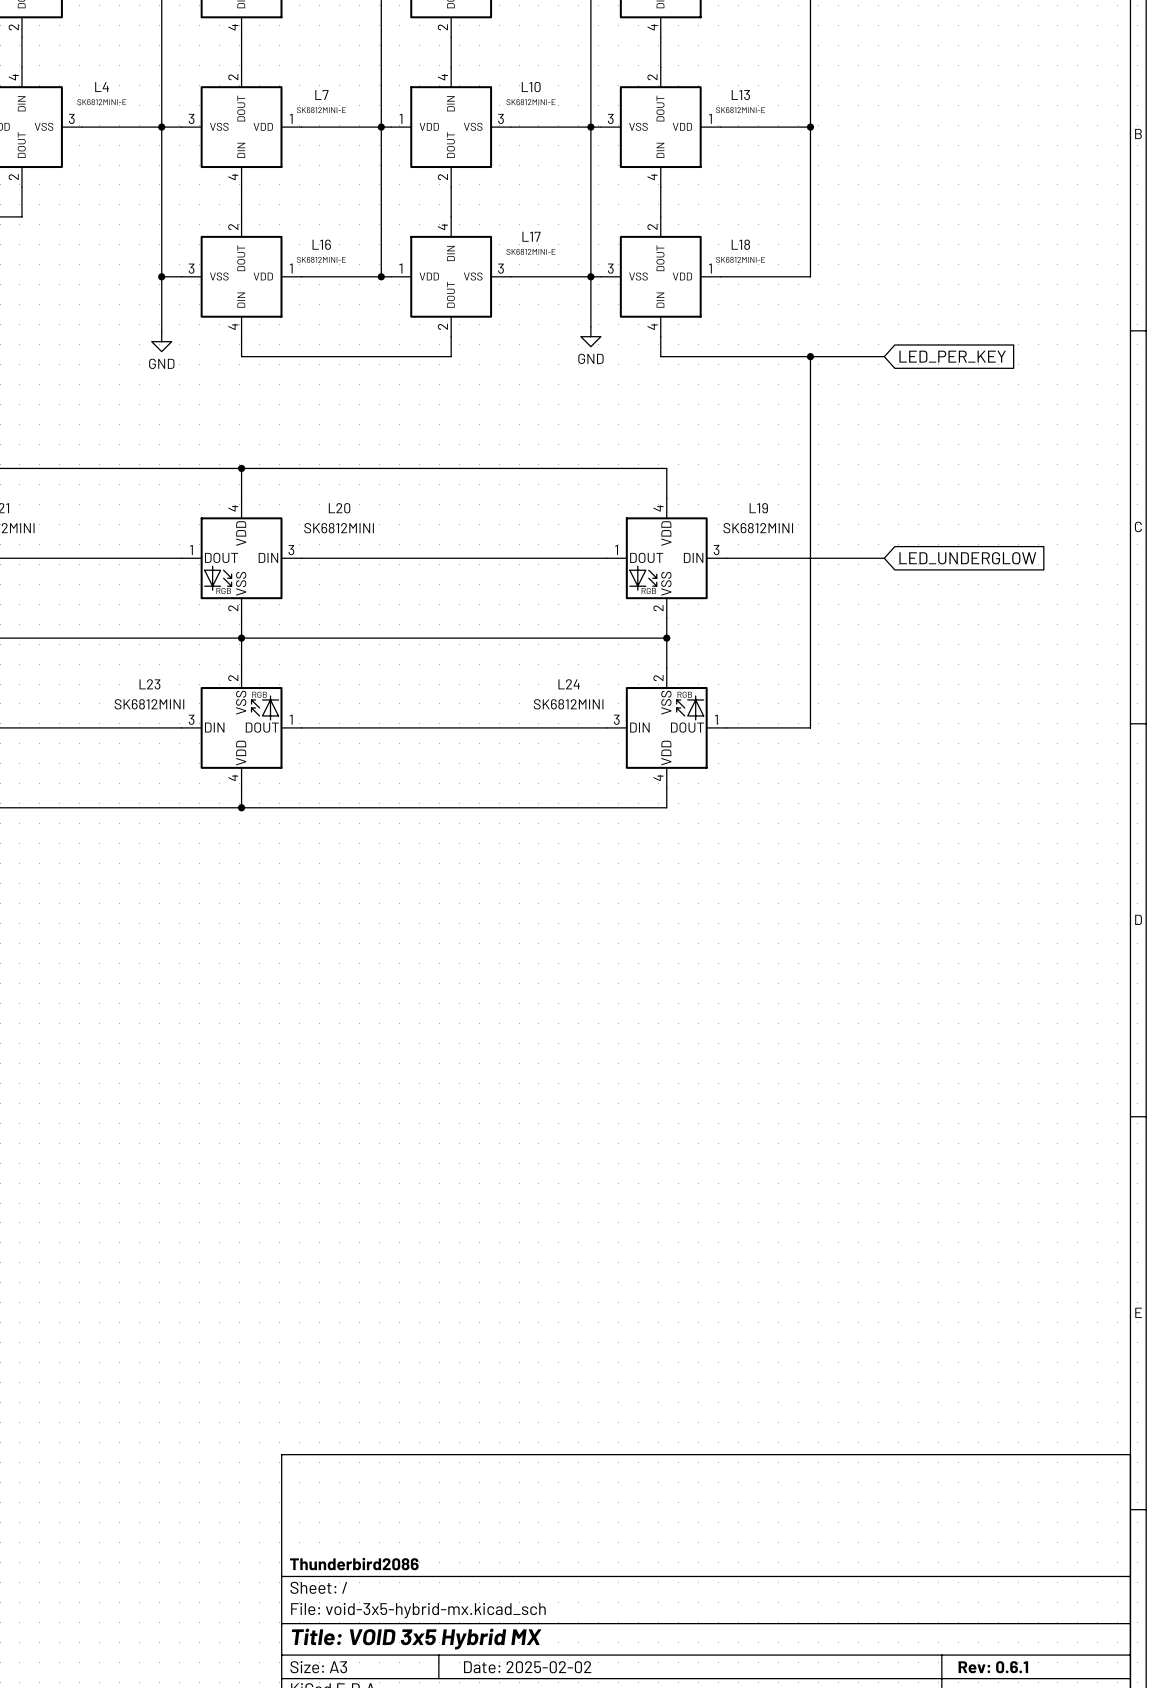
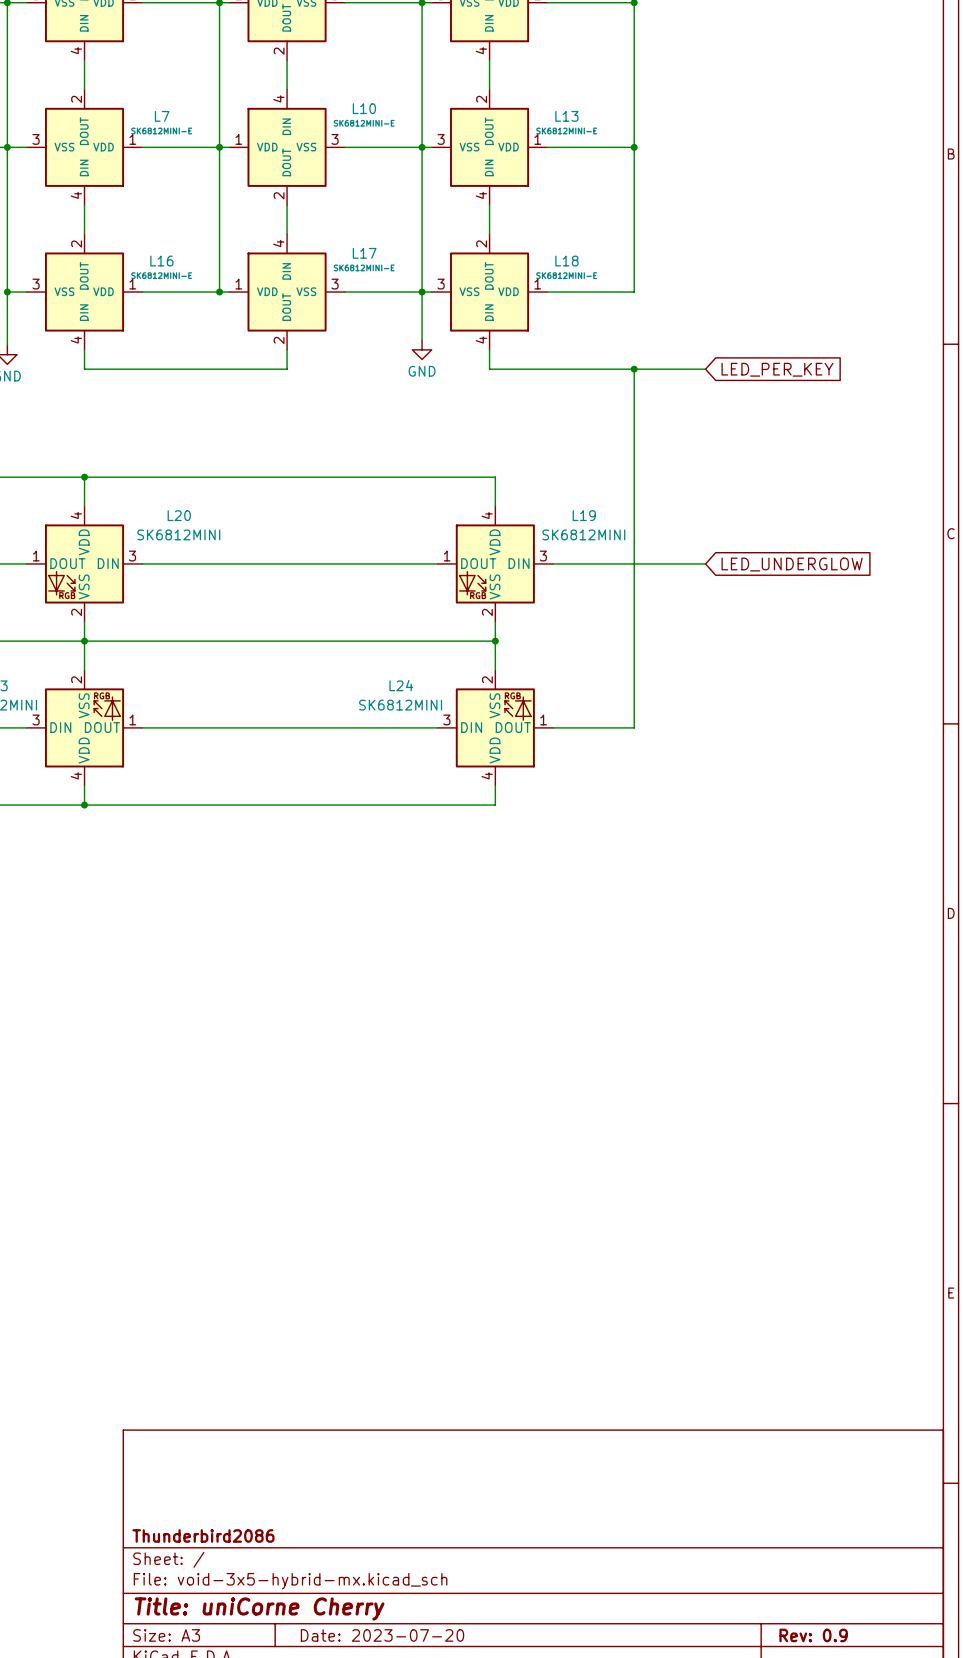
title block: Title: VOID 3x5 Hybrid MX (416, 1639) -> Title: uniCorne Cherry (259, 1609)
title block: Date: 2025-02-02 (527, 1667) -> Date: 2023-07-20 (382, 1635)
title block: Rev: 0.6.1 (993, 1667) -> Rev: 0.9 (813, 1635)

